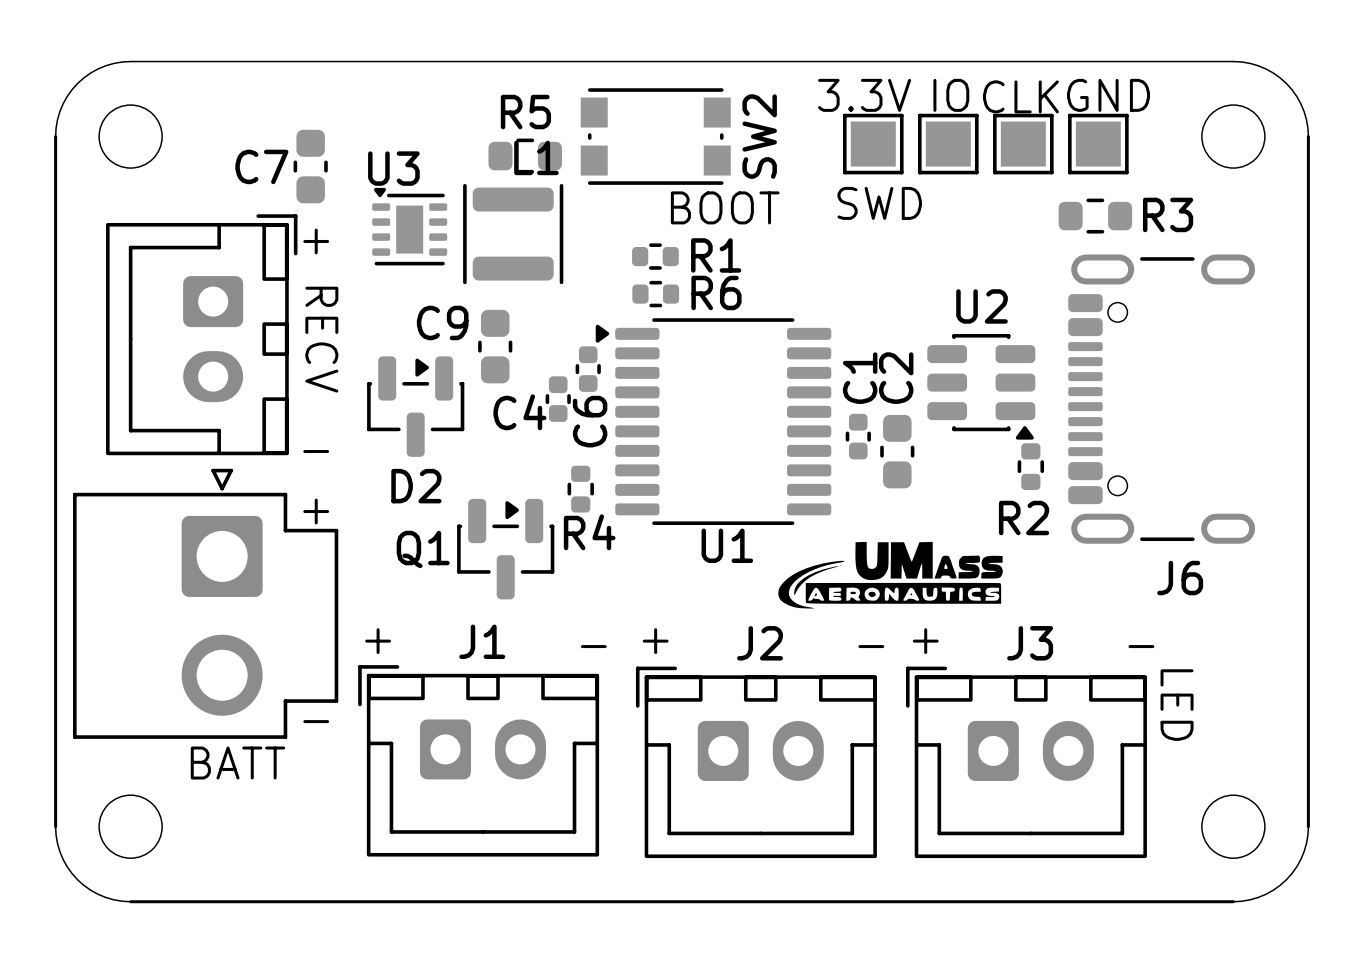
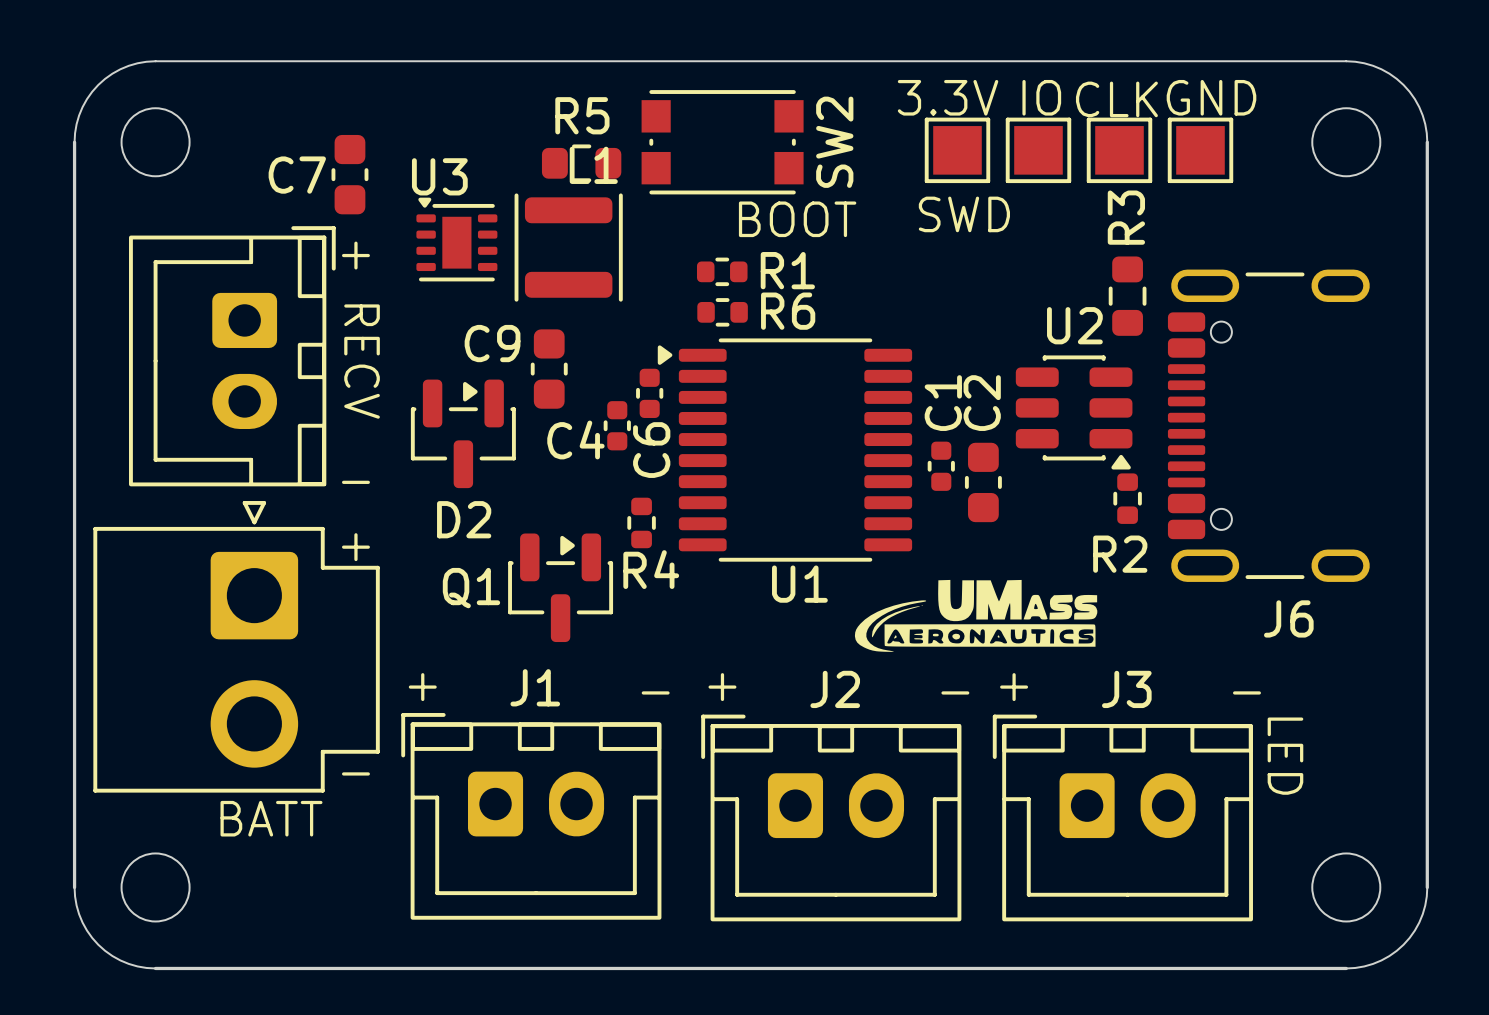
R3 name position: R3 (1168, 214) -> R3 (1126, 217)
R3 rotation: 0° (1095, 216) -> 90° clockwise (1127, 296)
R3 position: (1095, 216) -> (1127, 296)

